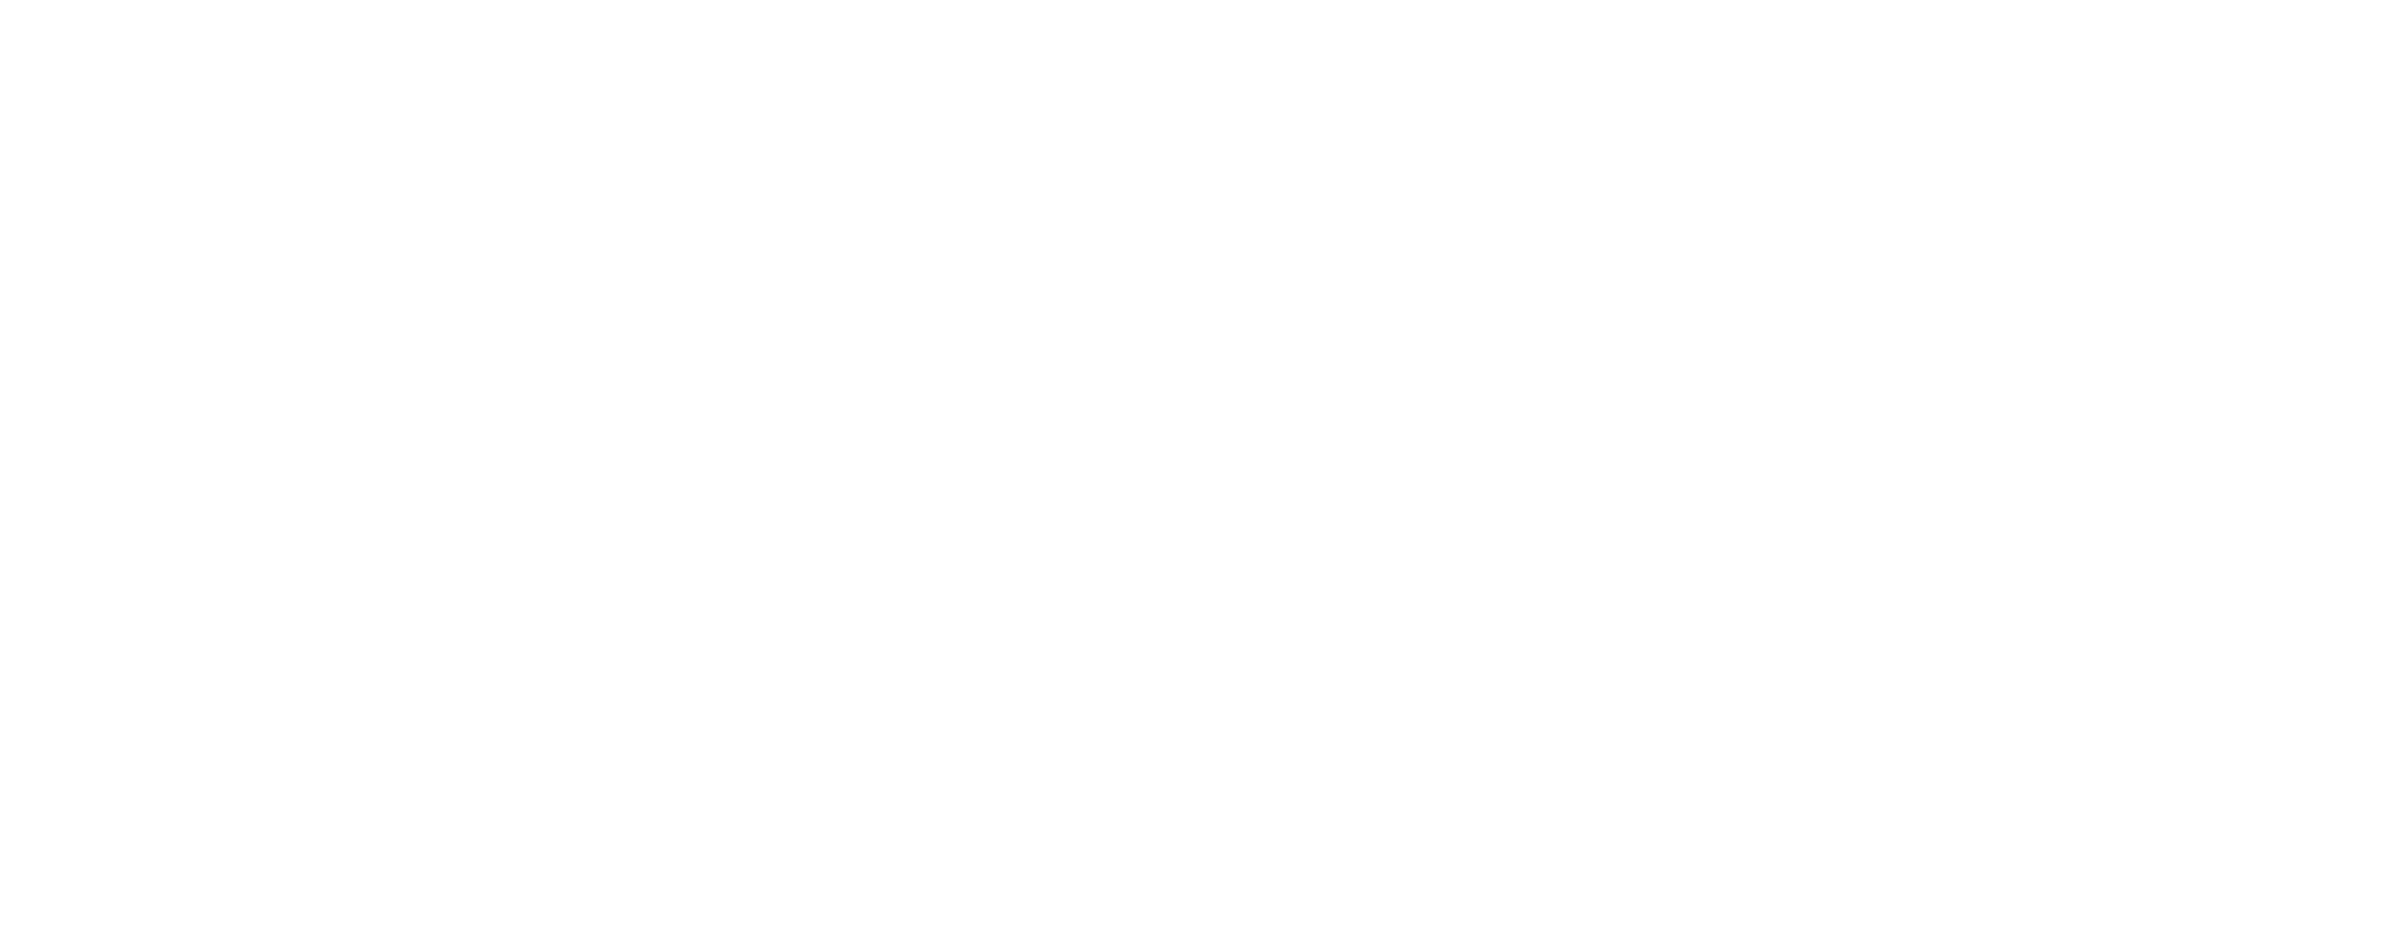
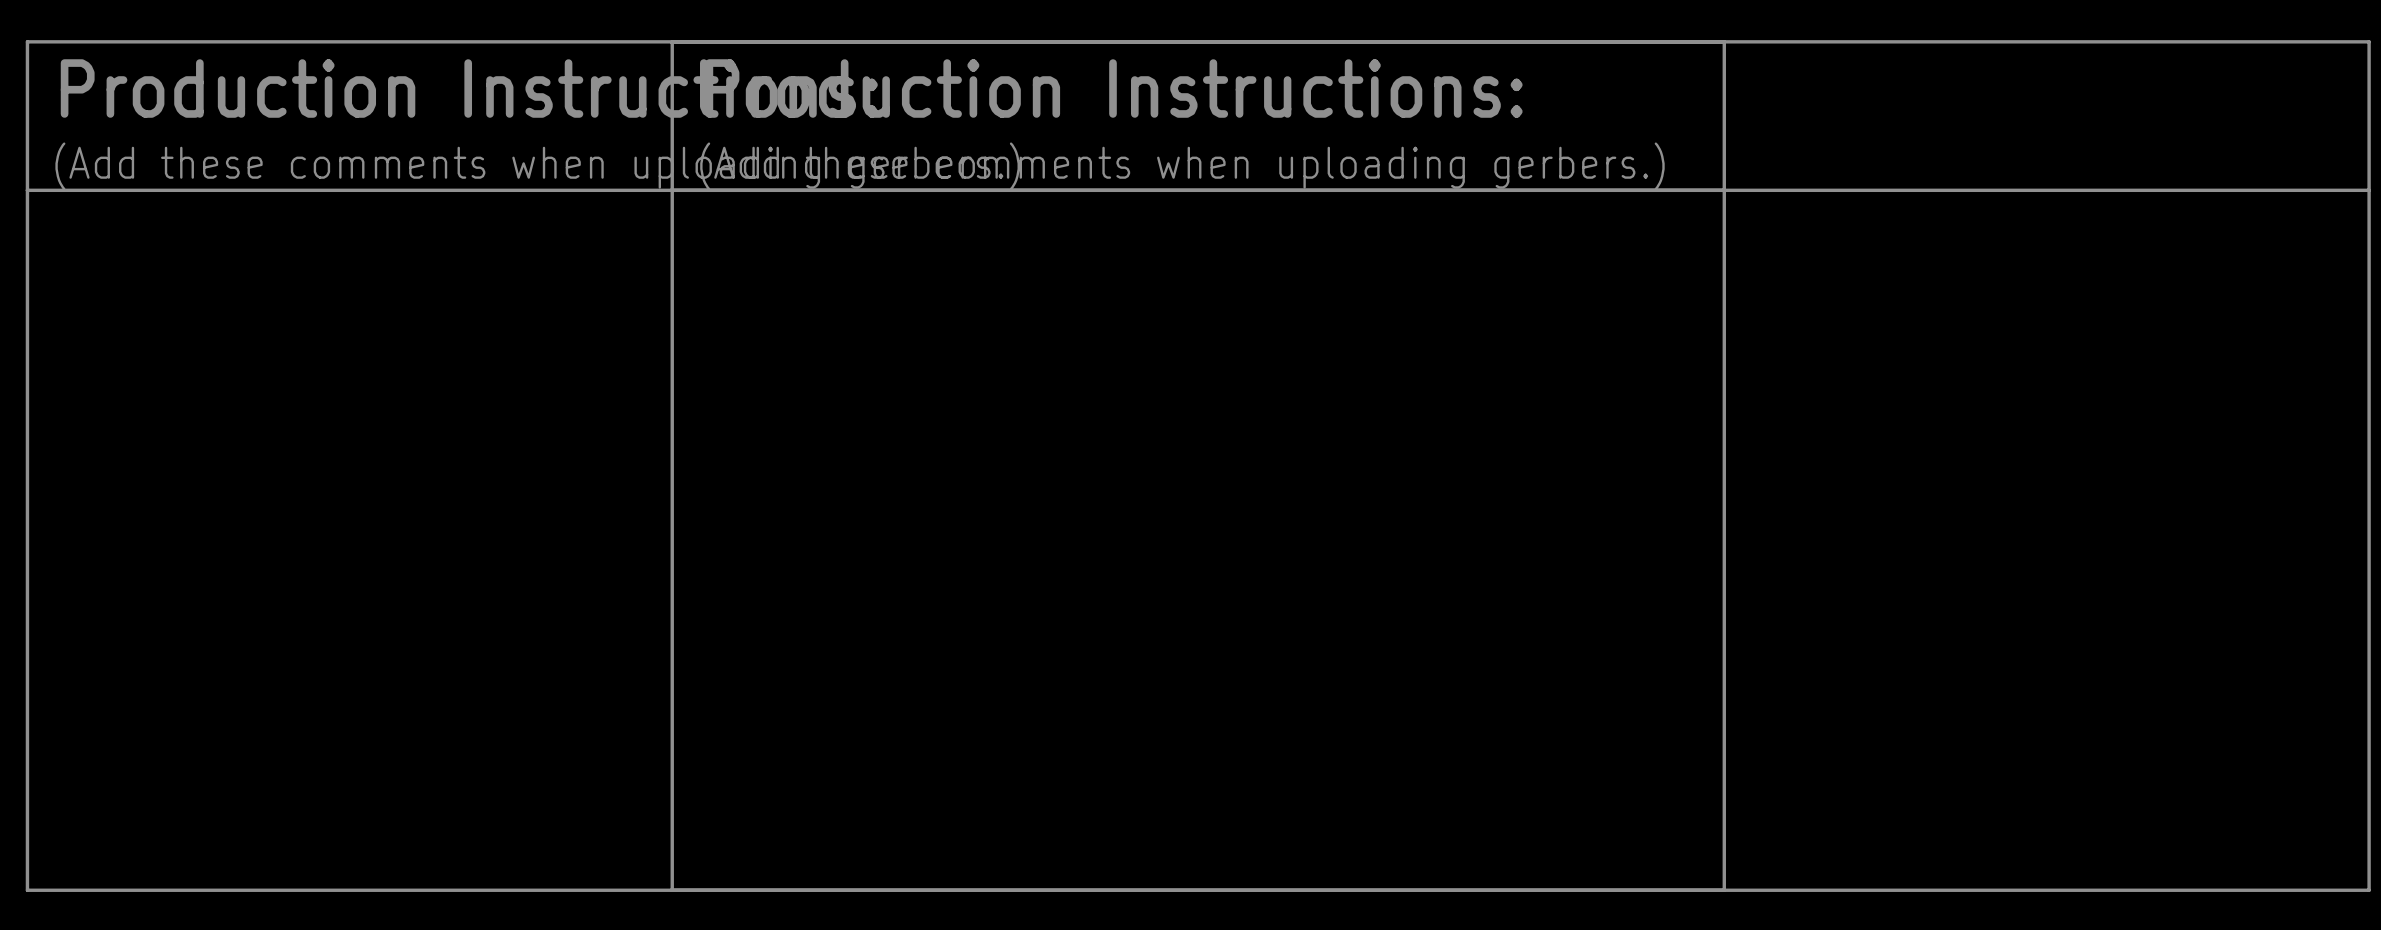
drawing: none -> [25, 40, 2371, 892]

